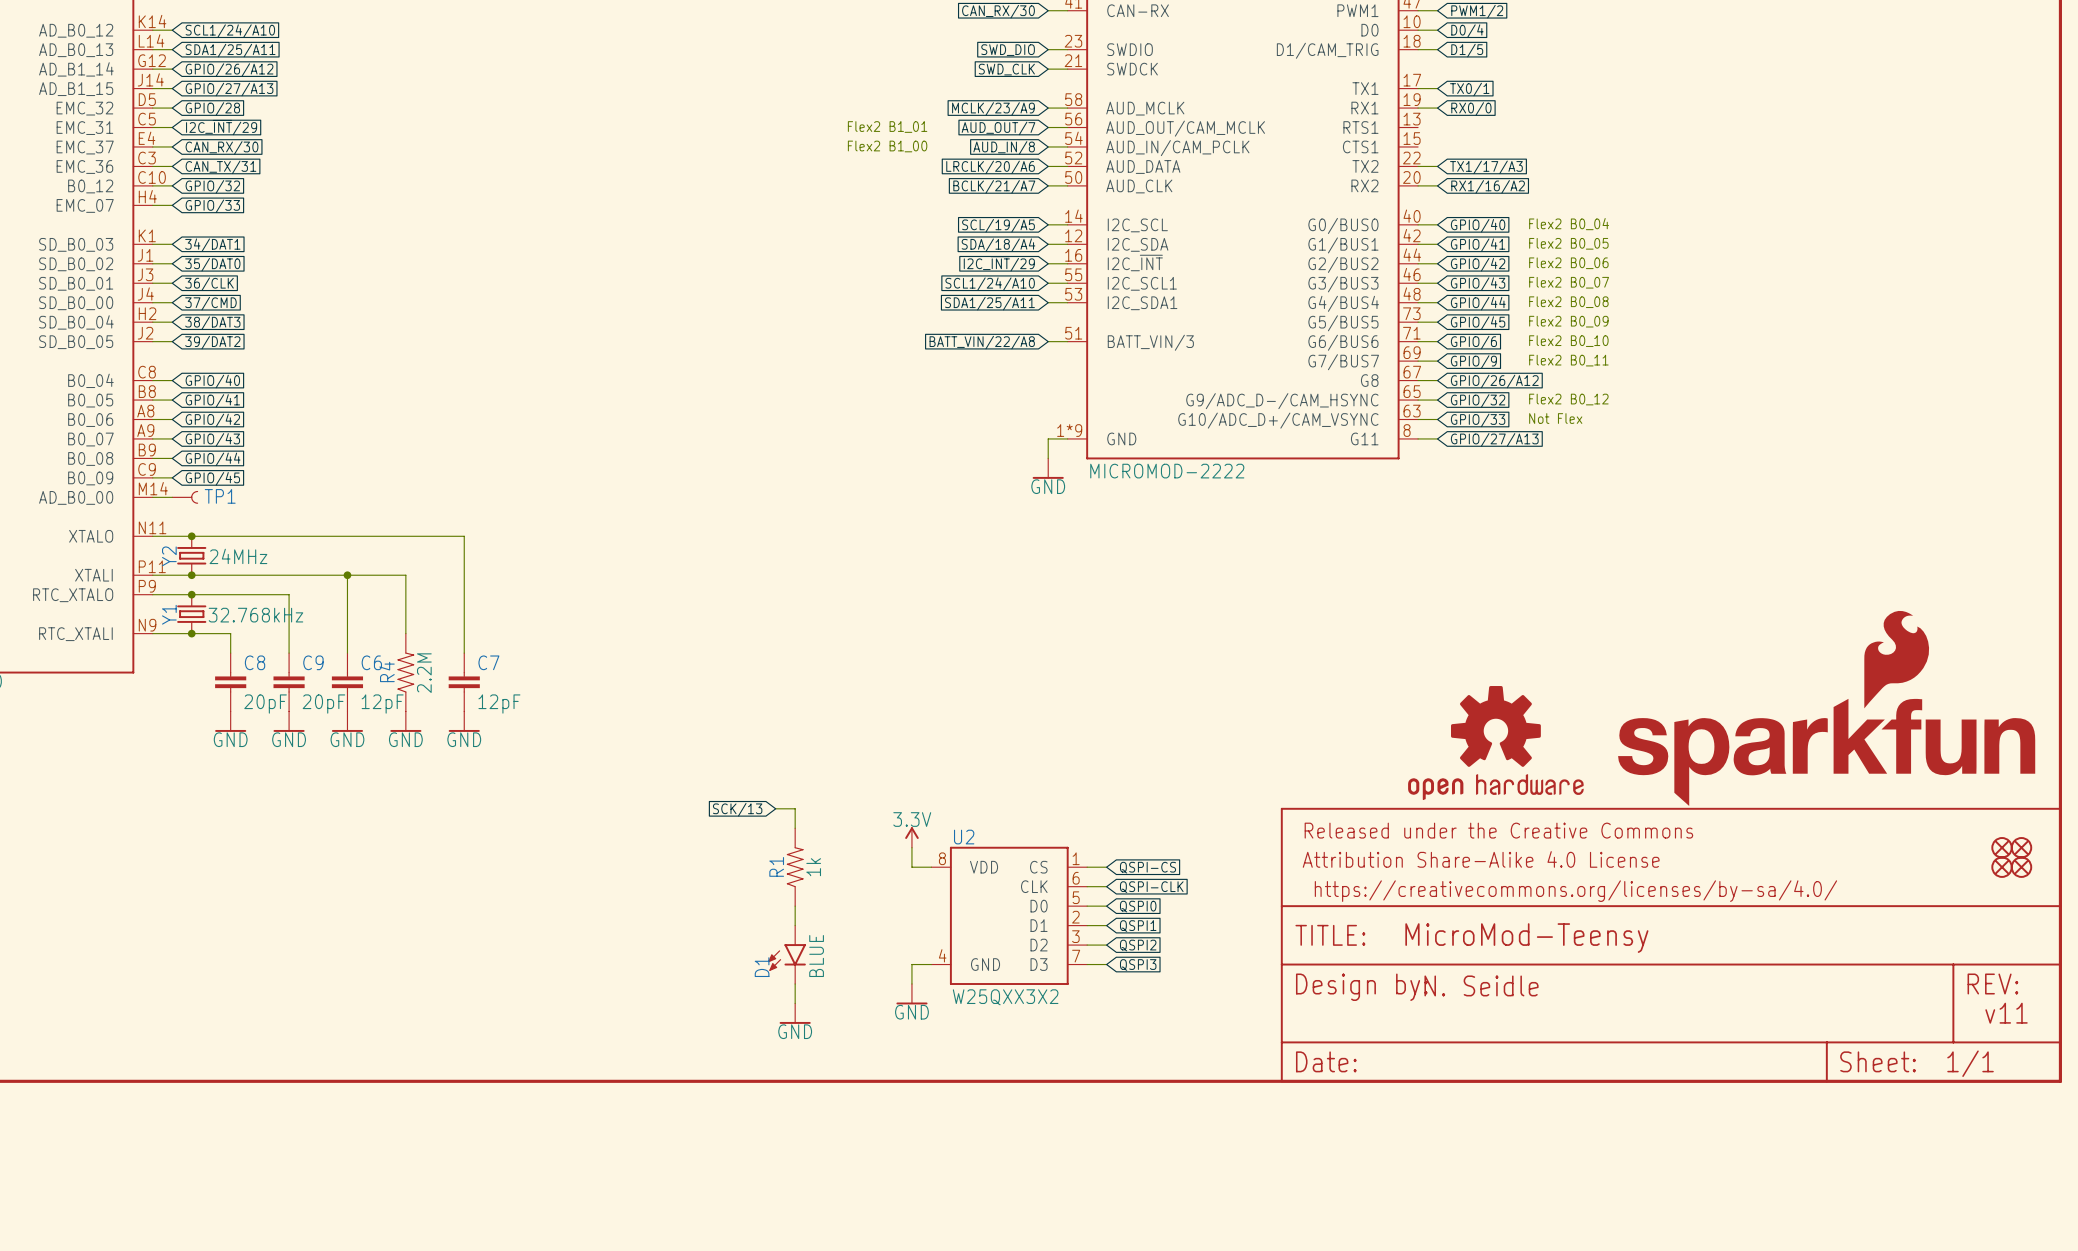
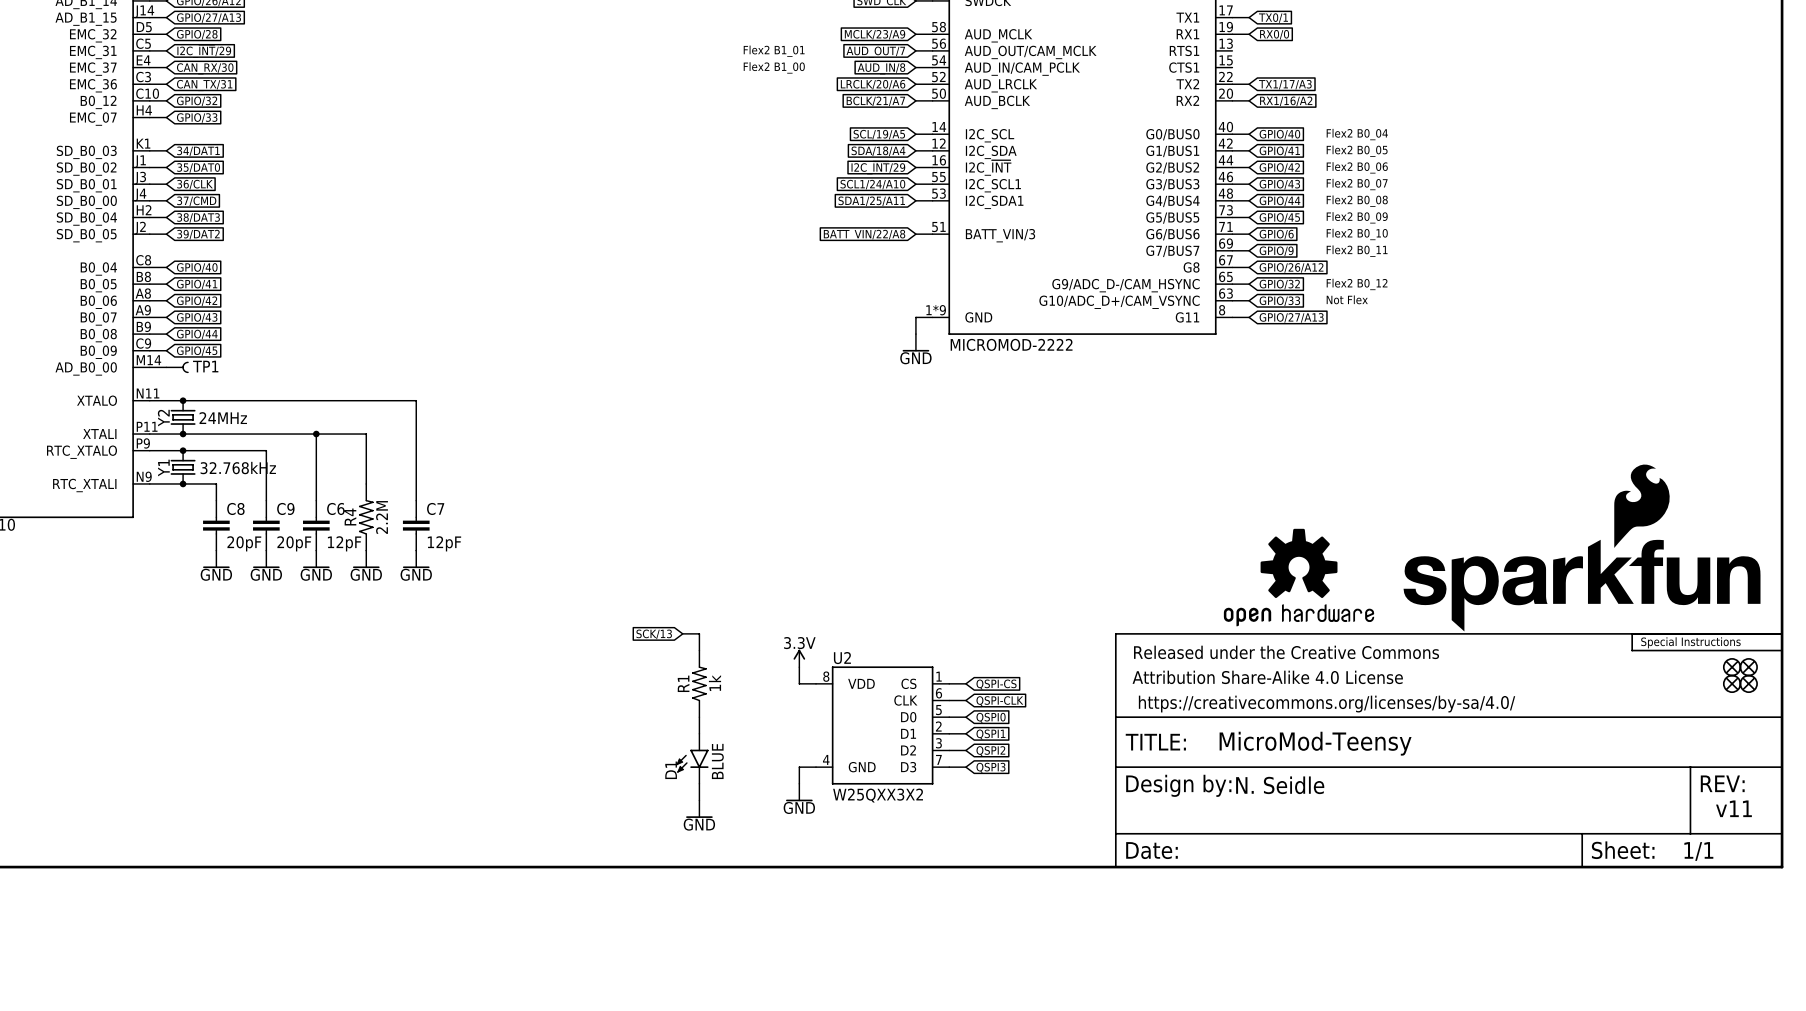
part pin name: AUD_DATA (1143, 167) -> AUD_LRCLK (1000, 85)
part pin name: AUD_CLK (1139, 186) -> AUD_BCLK (997, 102)
part: none -> (1707, 642)

